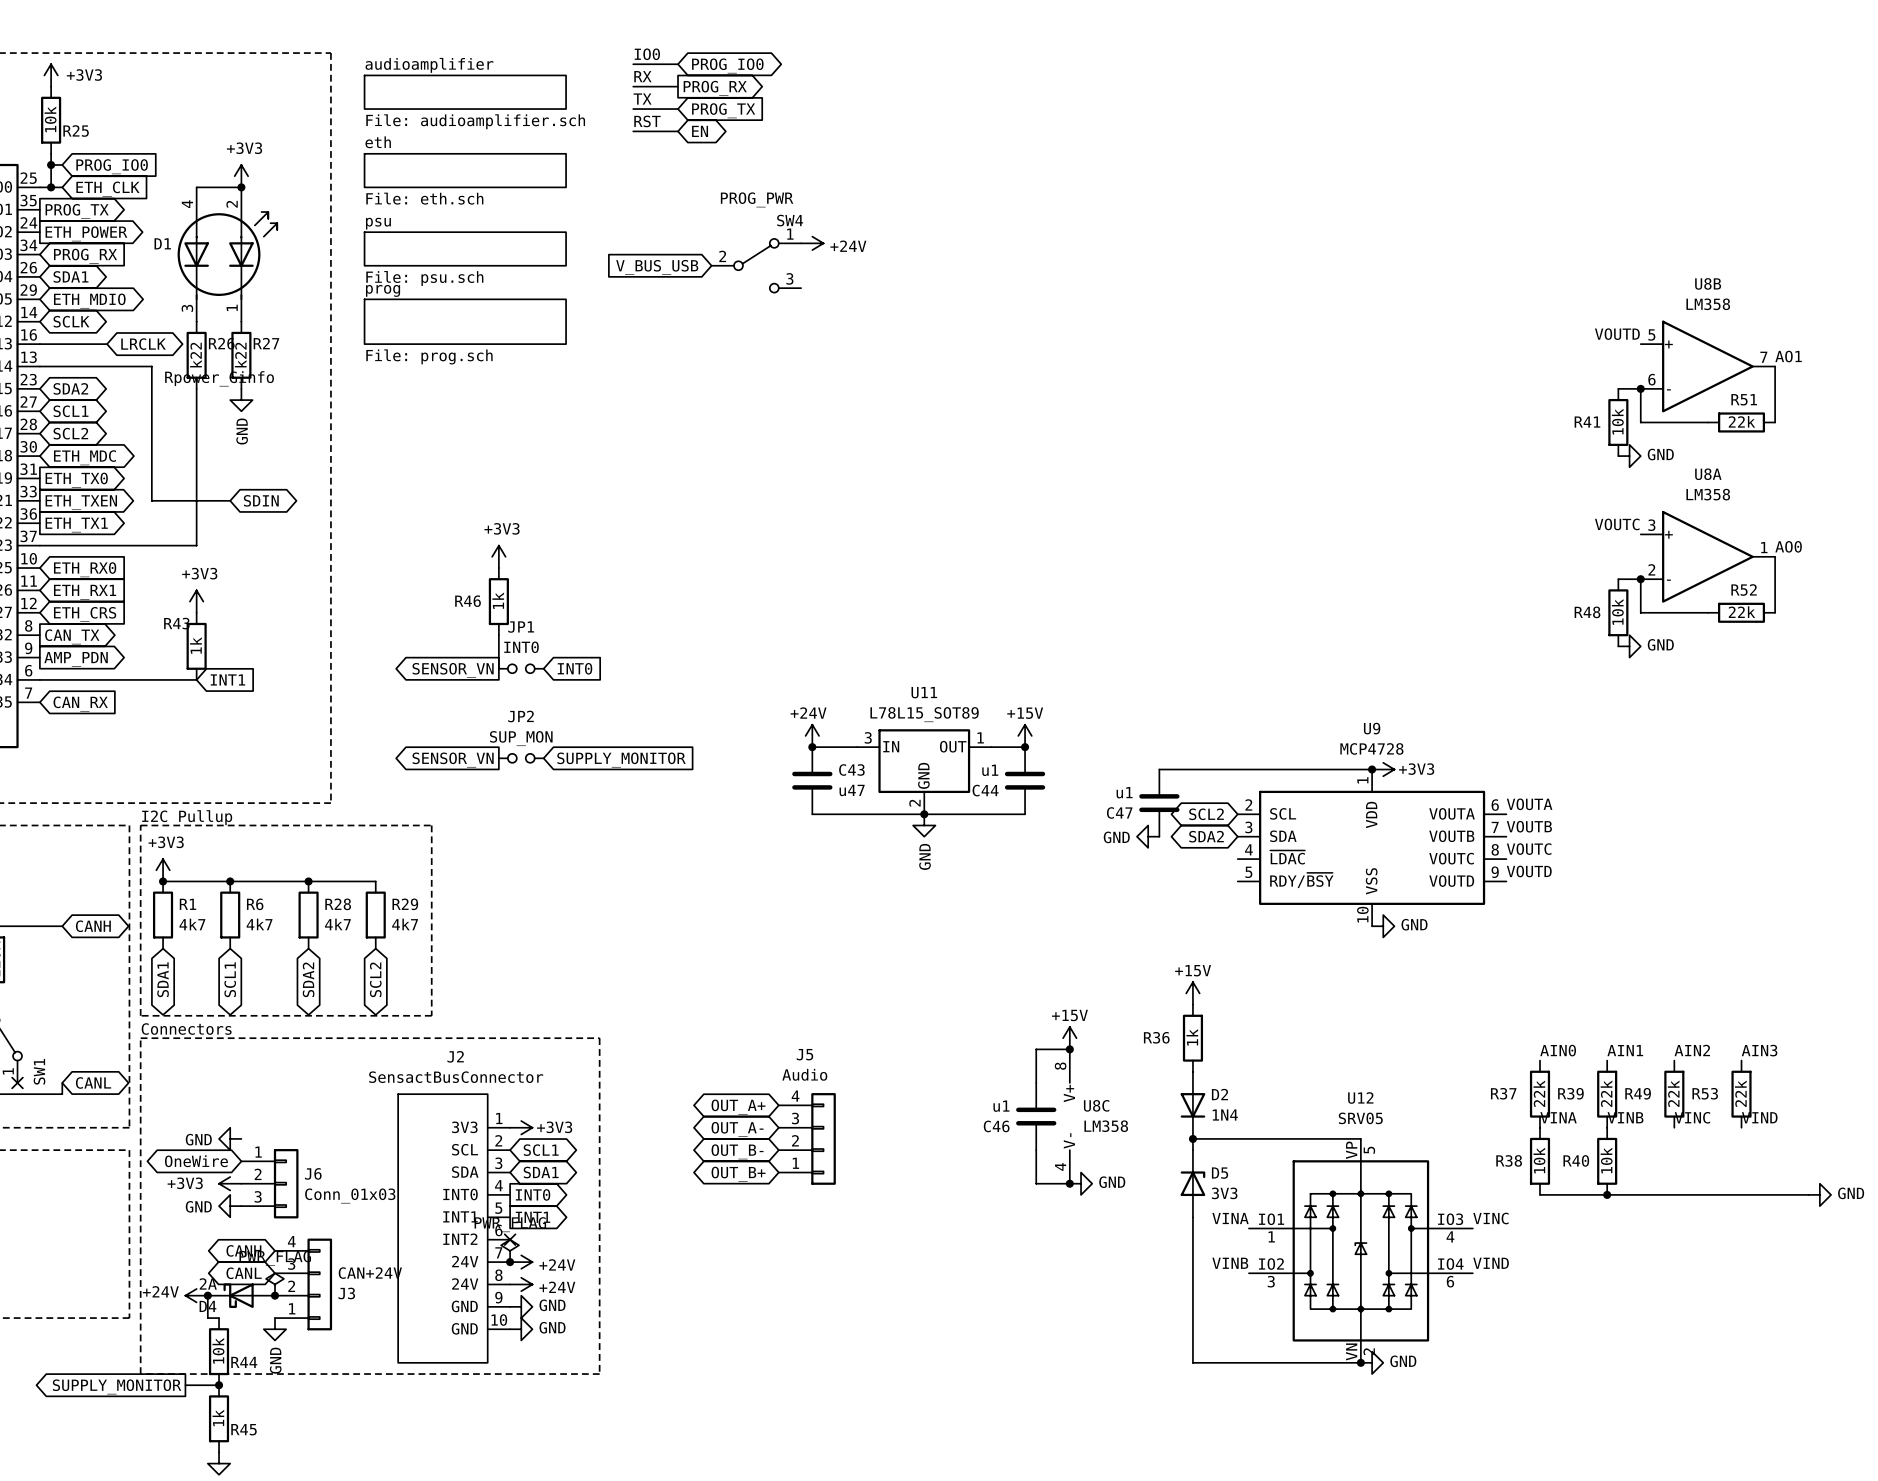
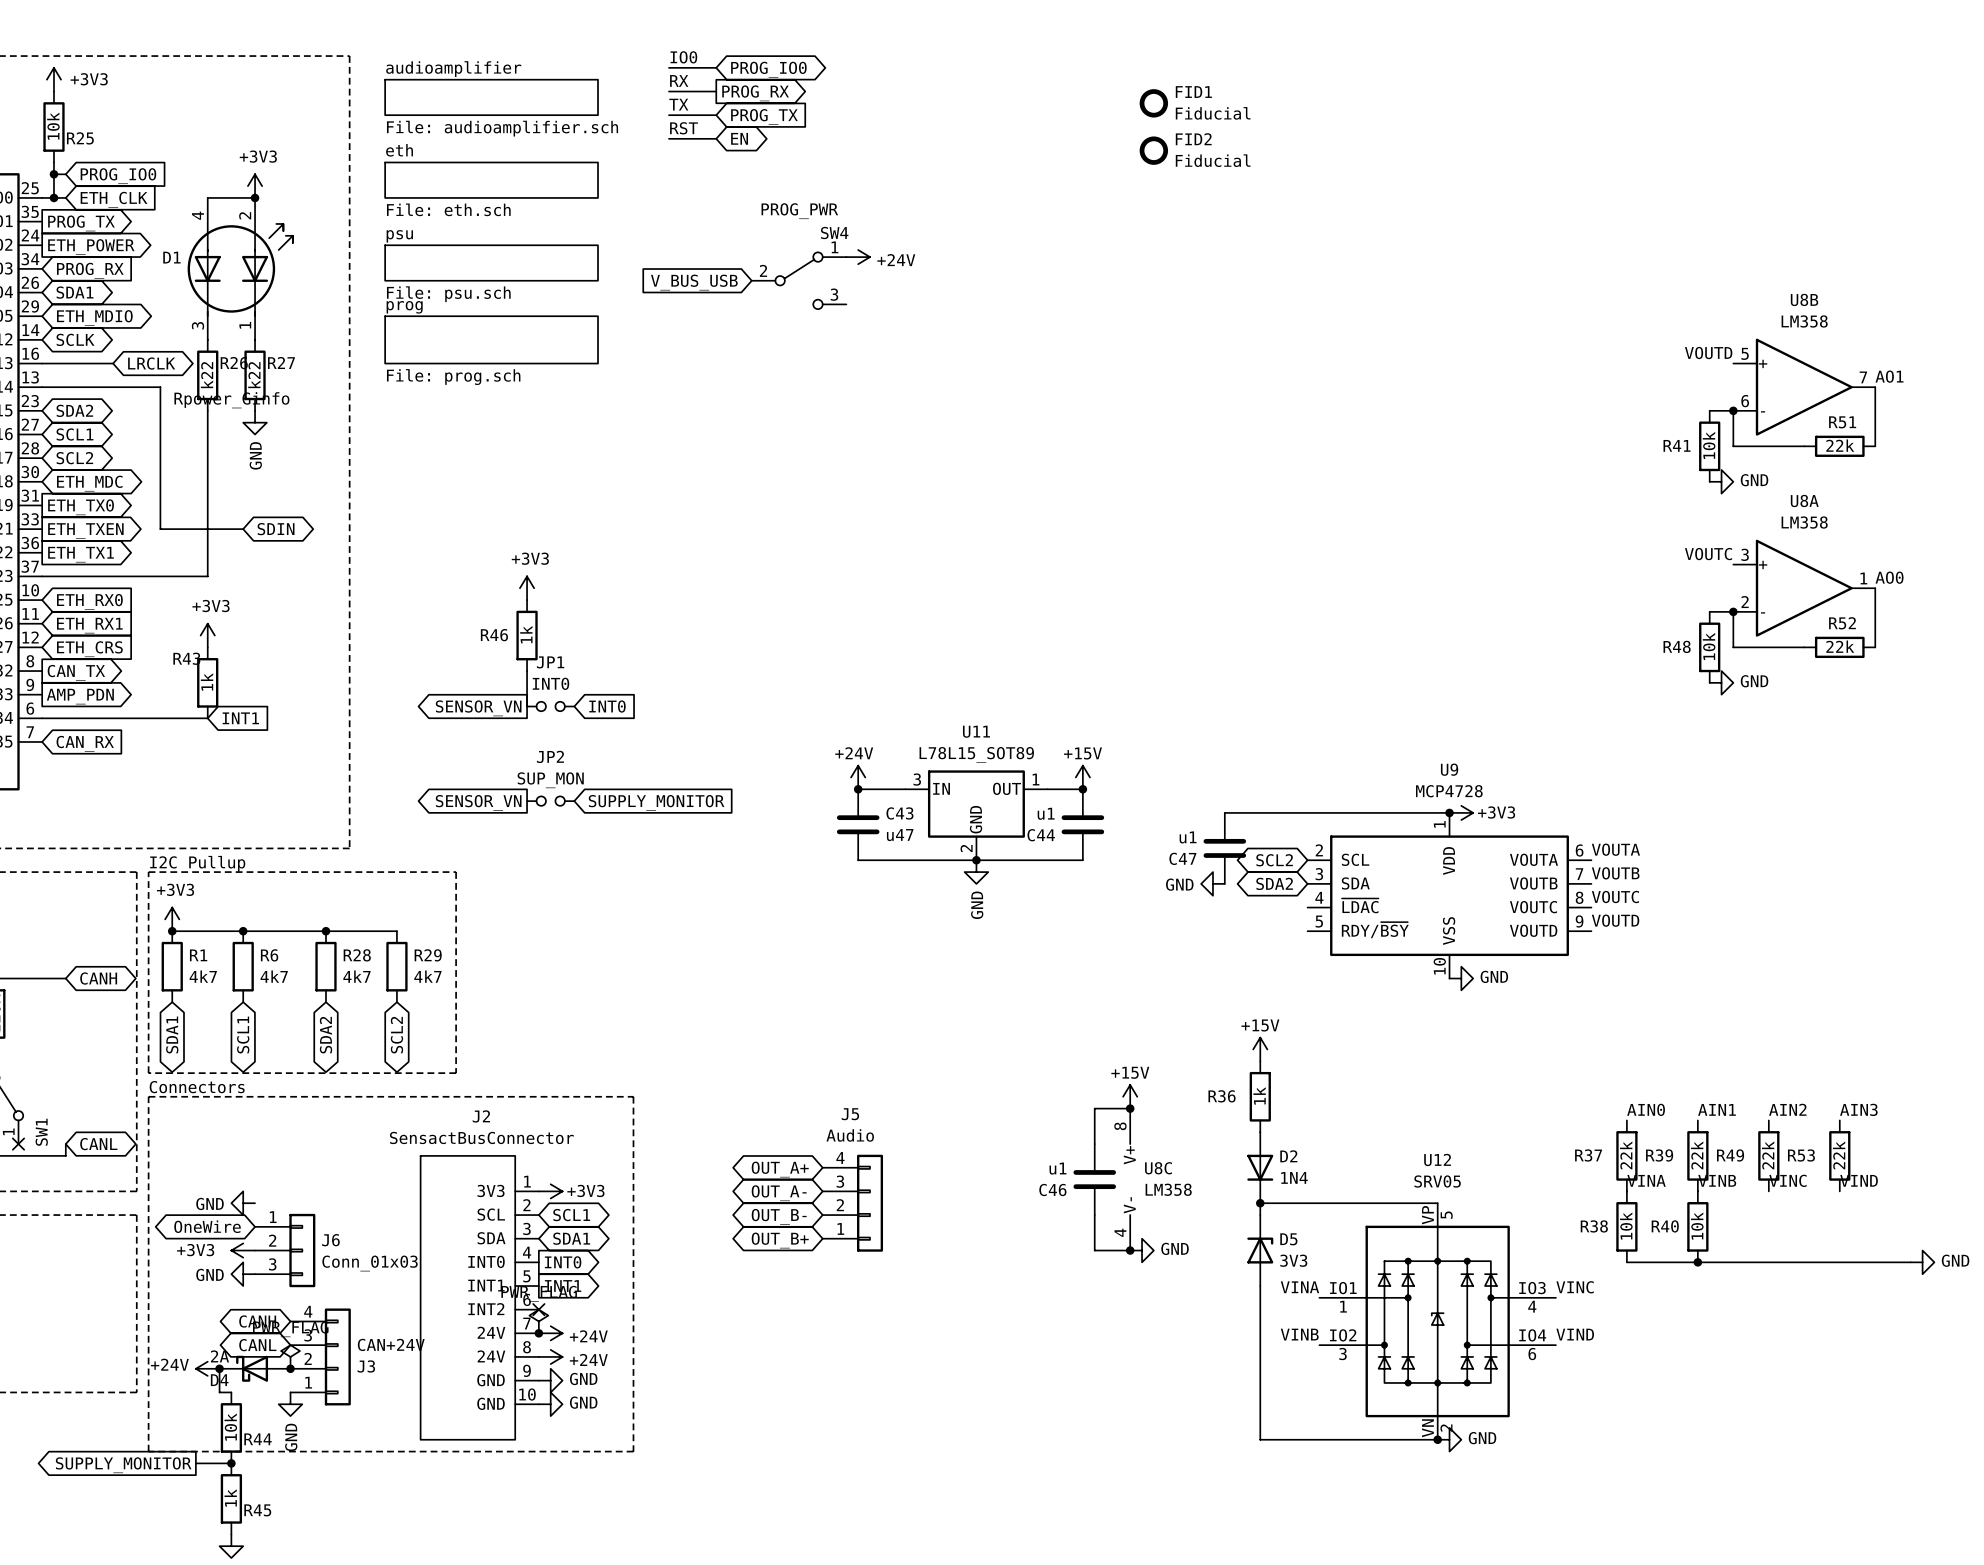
FID1: none -> Fiducial (1153, 103)
FID2: none -> Fiducial (1153, 150)

